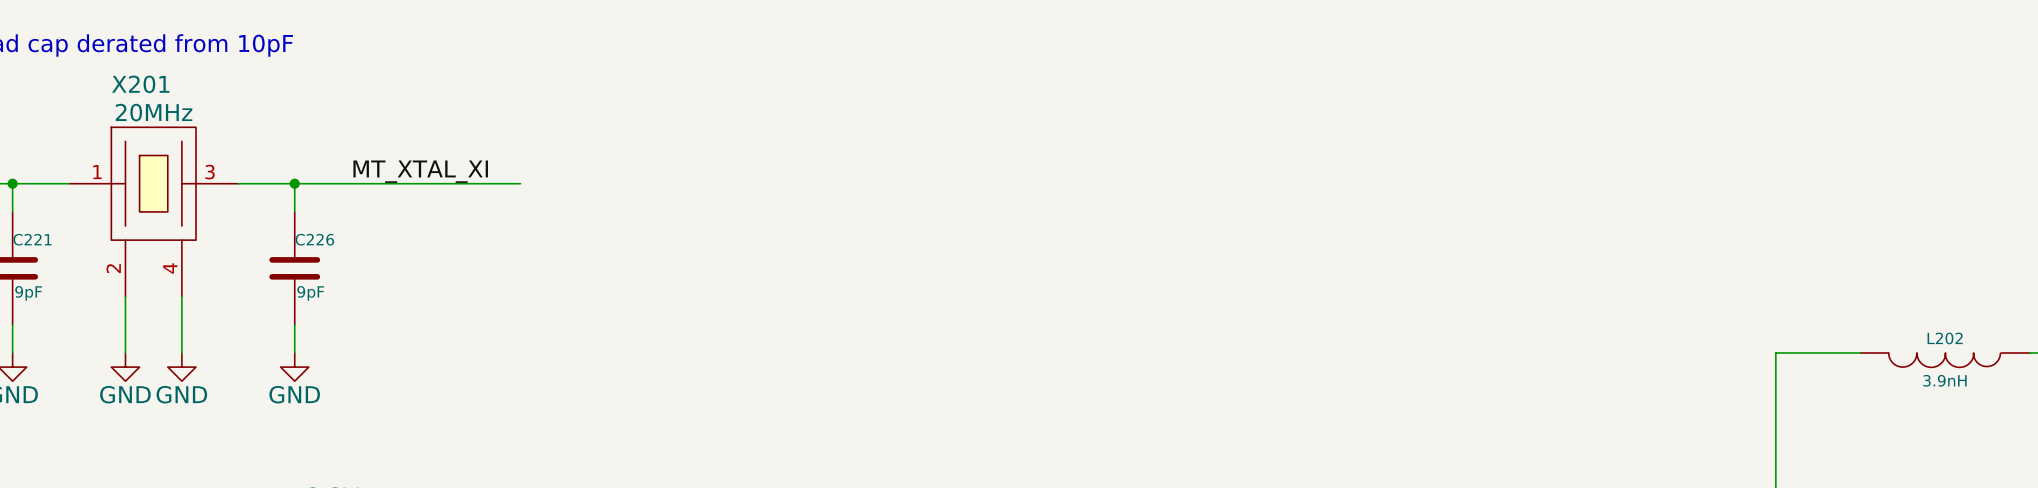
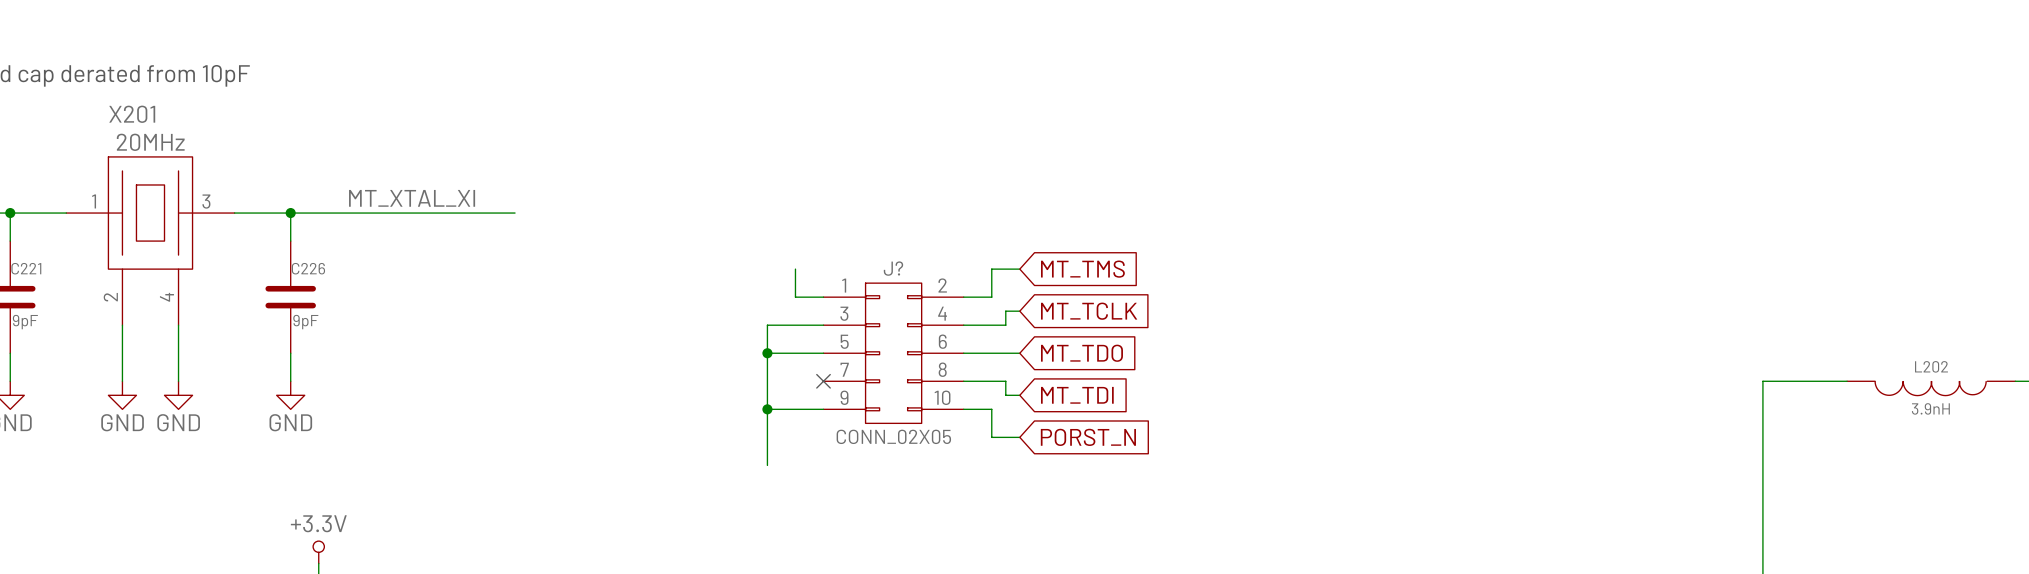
wire: none -> (795, 269) (795, 297) (823, 297)
wire: none -> (1019, 269) (991, 269) (991, 297) (963, 297)
global label: none -> MT_TMS (1082, 269)
wire: none -> (1019, 311) (1005, 311) (1005, 325) (963, 325)
global label: none -> MT_TCLK (1089, 311)
wire: none -> (823, 325) (767, 325) (767, 465)
wire: none -> (767, 353) (823, 353)
junction: none -> (767, 353)
J?: none -> CONN_02X05 (893, 353)
wire: none -> (963, 353) (1019, 353)
global label: none -> MT_TDO (1081, 353)
no-connect mark: none -> (823, 381)
wire: none -> (963, 381) (1005, 381) (1005, 395) (1019, 395)
global label: none -> MT_TDI (1077, 395)
wire: none -> (767, 409) (823, 409)
junction: none -> (767, 409)
wire: none -> (963, 409) (991, 409) (991, 437) (1019, 437)
global label: none -> PORST_N (1088, 437)

